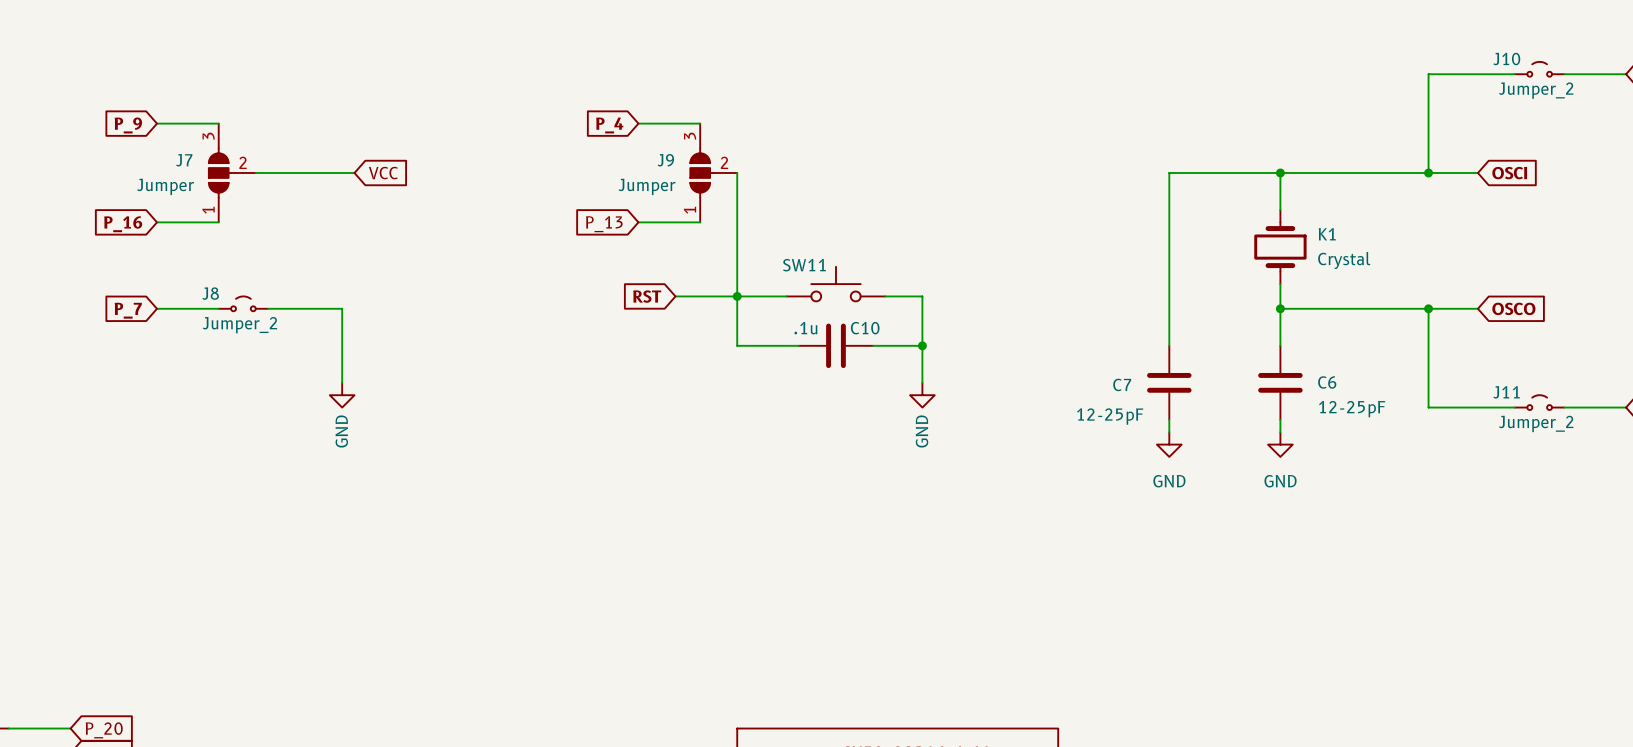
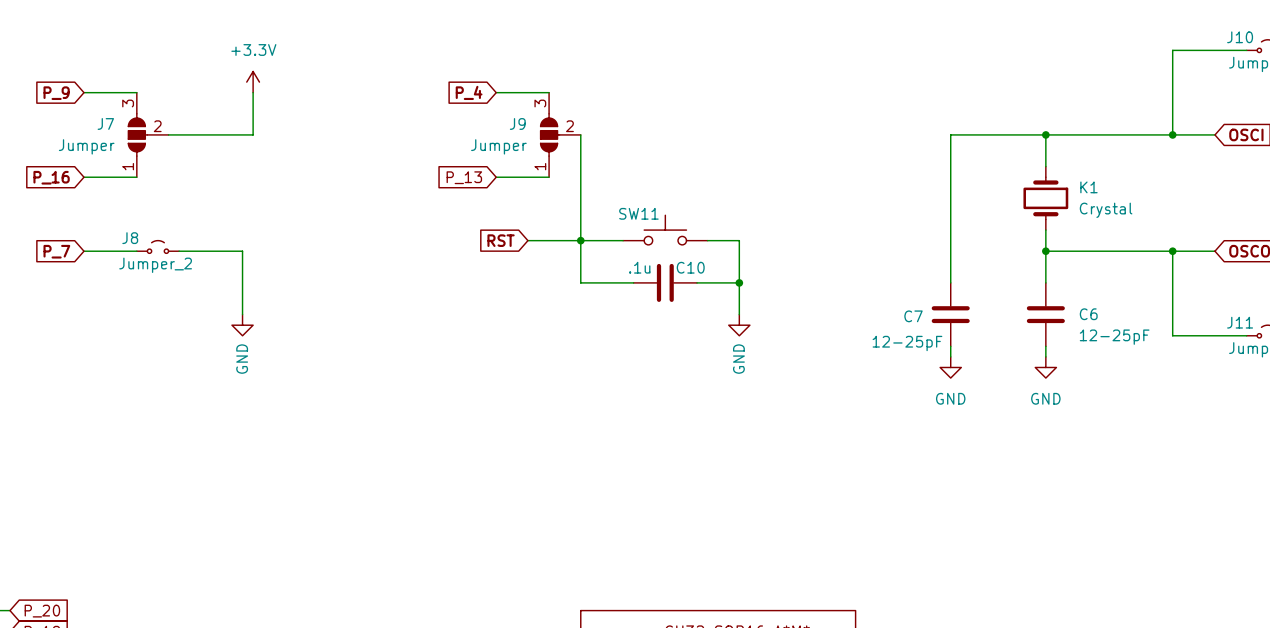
power symbol: none -> +3.3V (253, 82)
wire: none -> (253, 92) (253, 134)
global label: VCC (383, 173) -> none

